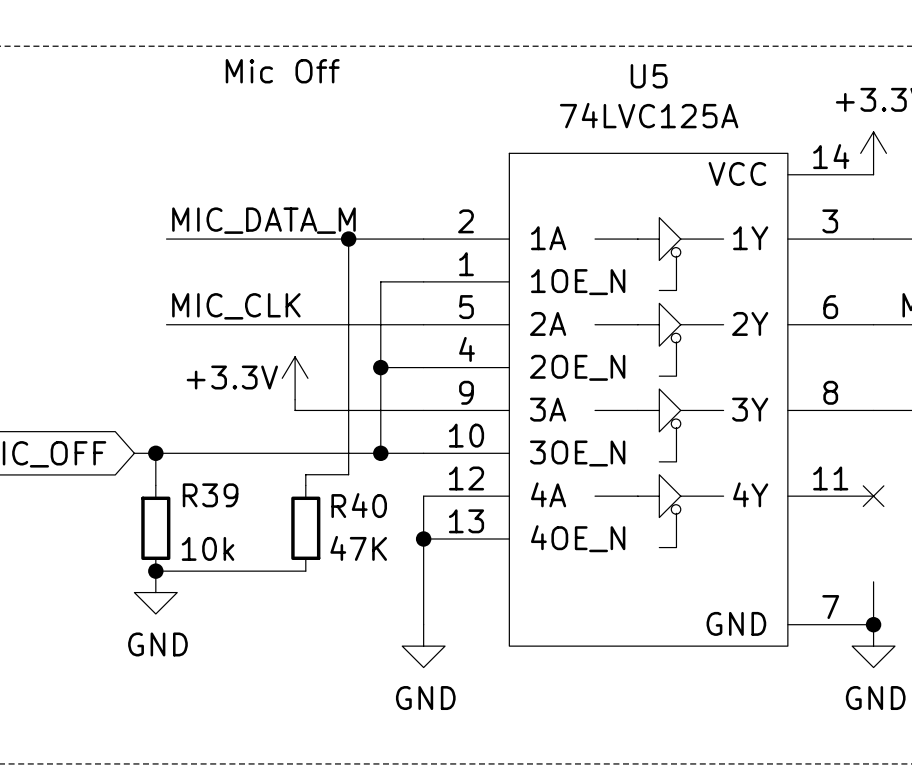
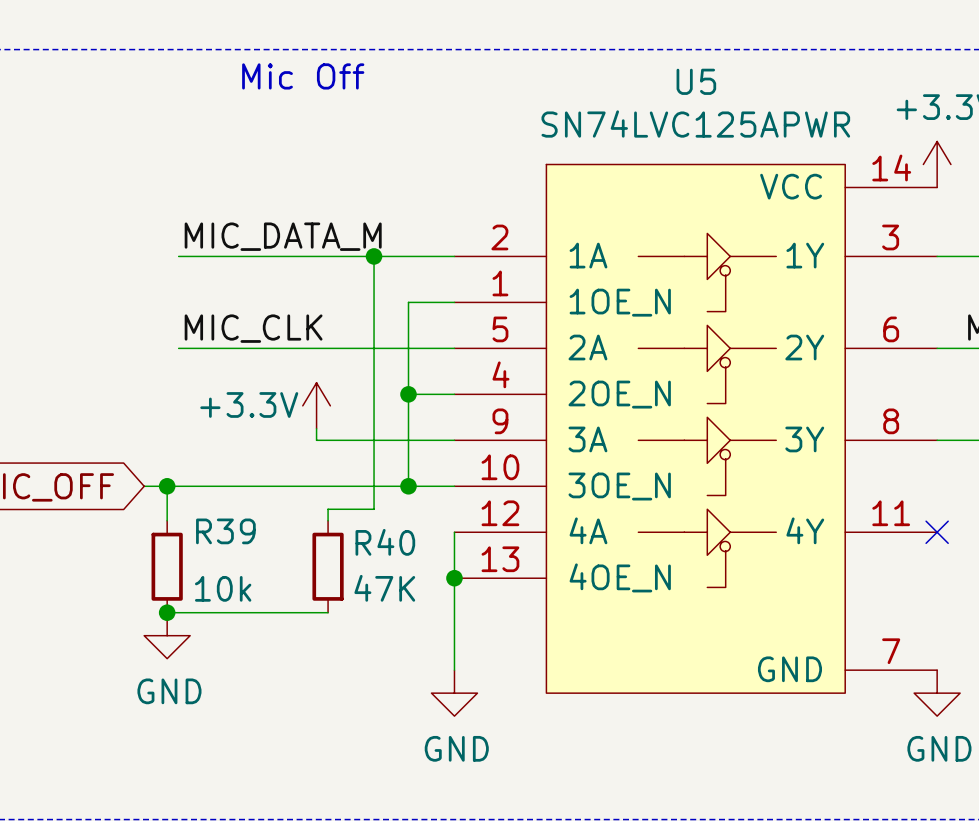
U5 value: 74LVC125A (649, 115) -> SN74LVC125APWR (695, 123)
wire: (873, 581) (873, 624) -> none
junction: (873, 624) -> none

